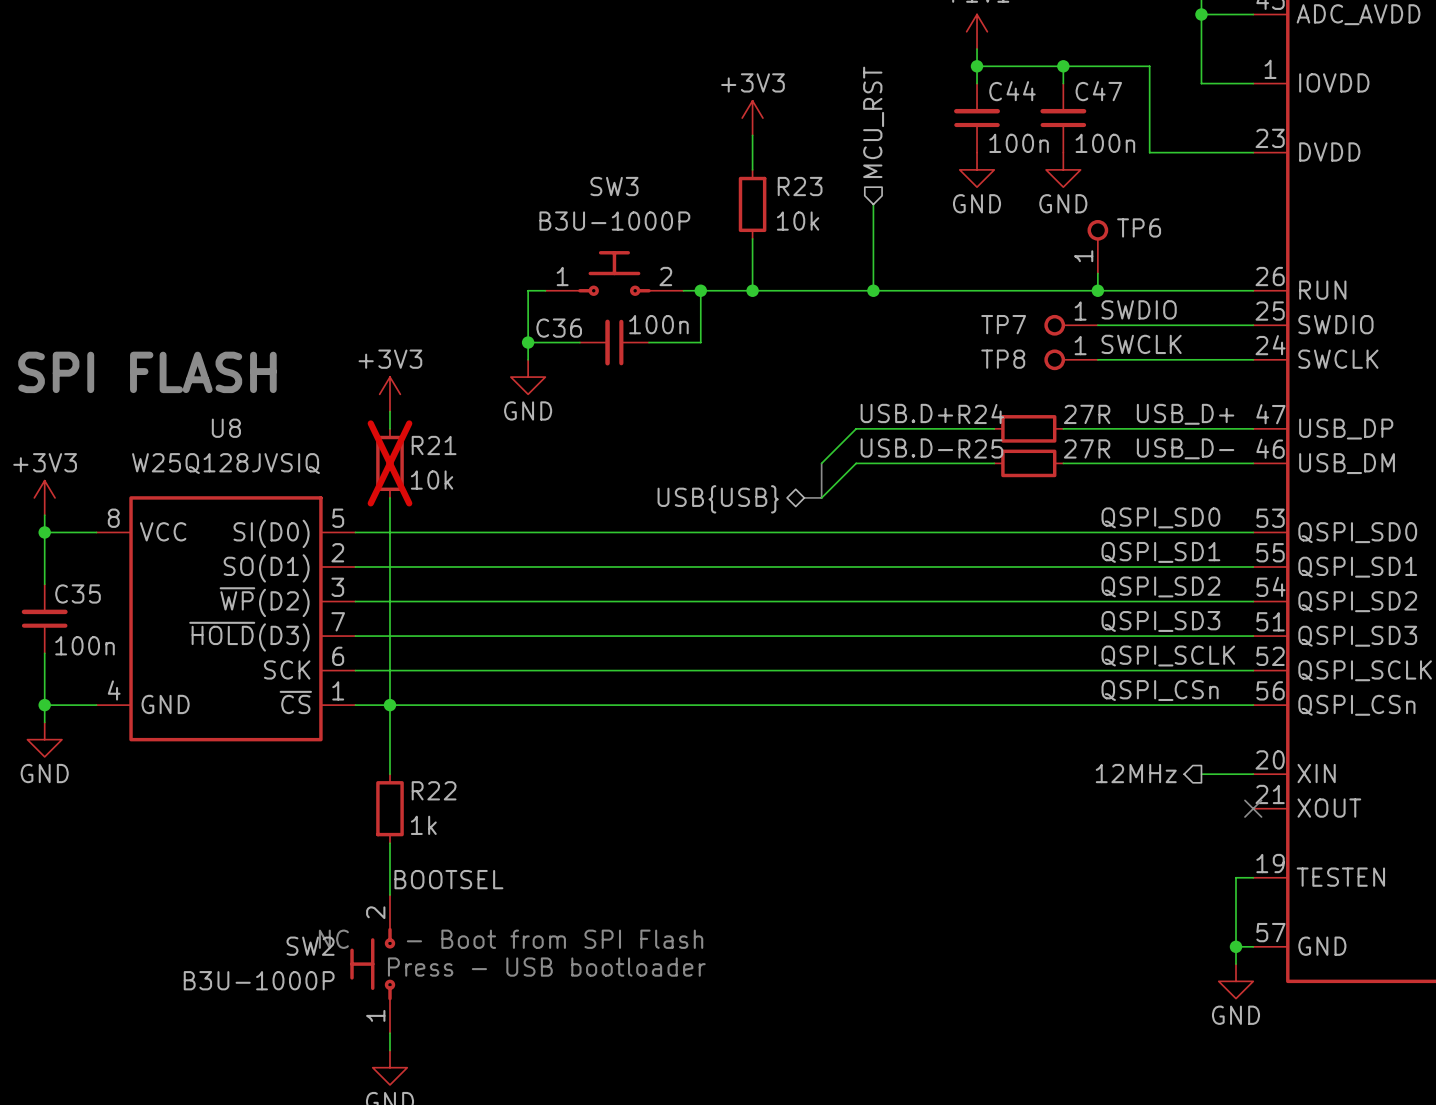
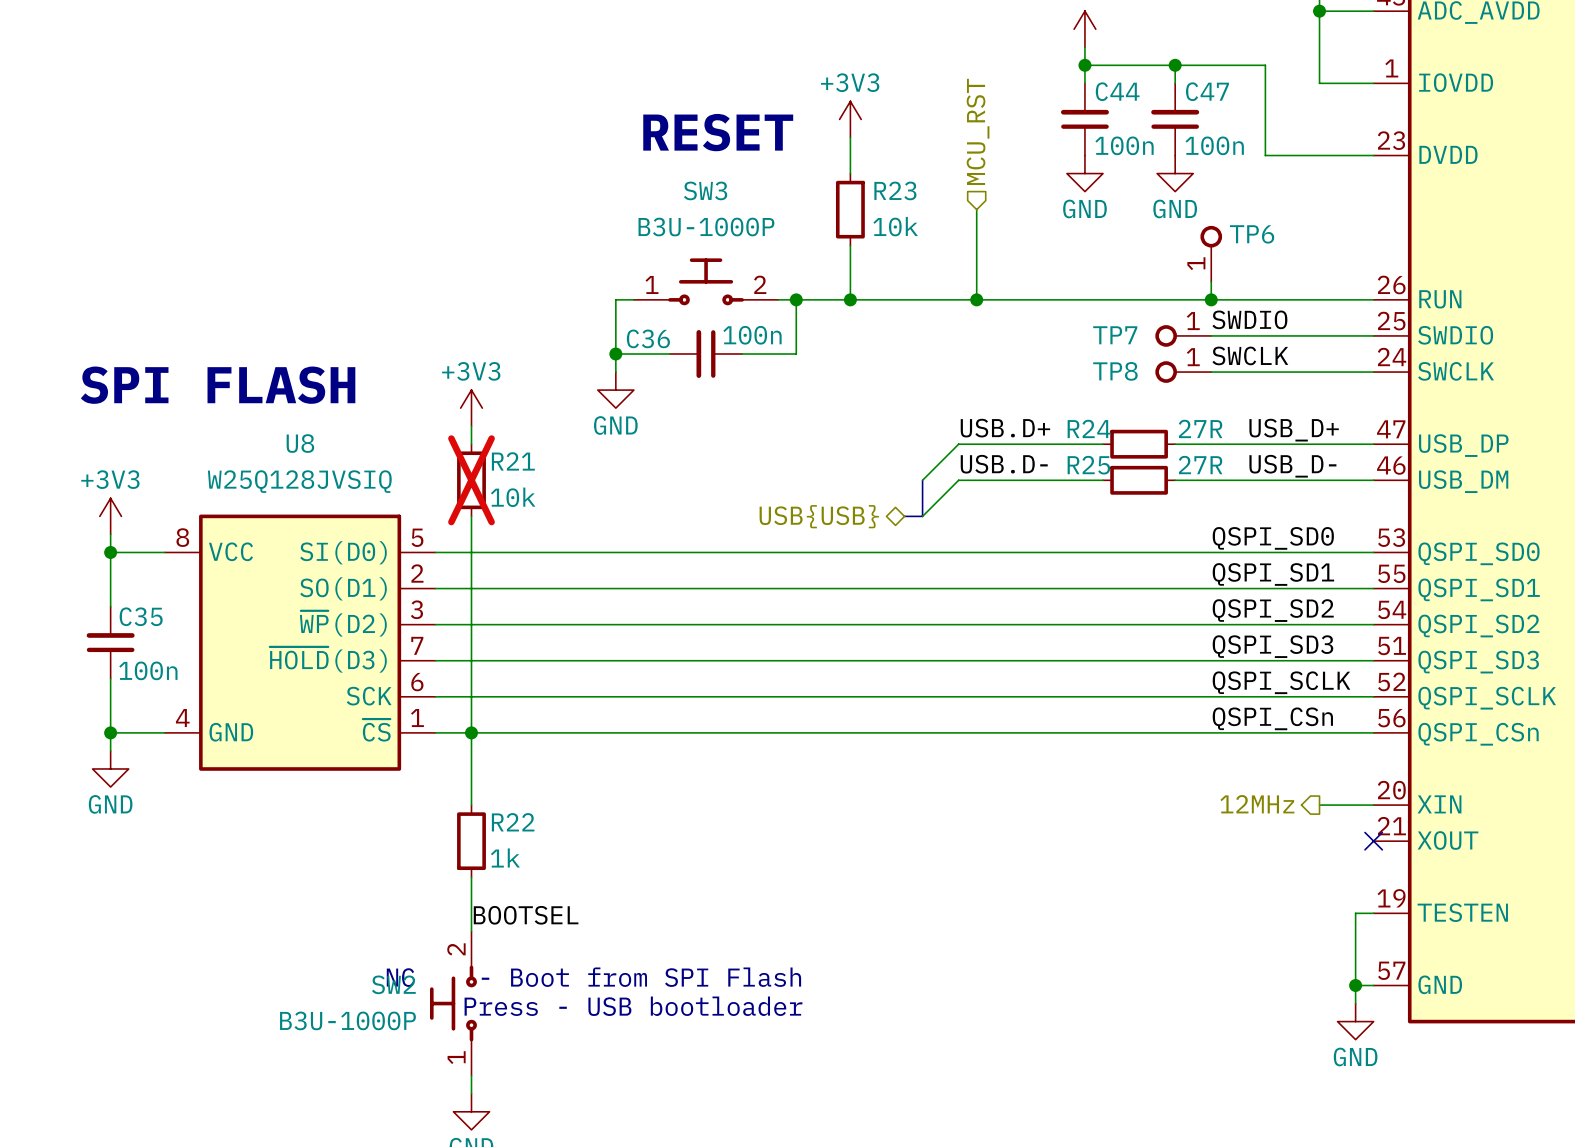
text: none -> RESET (718, 132)

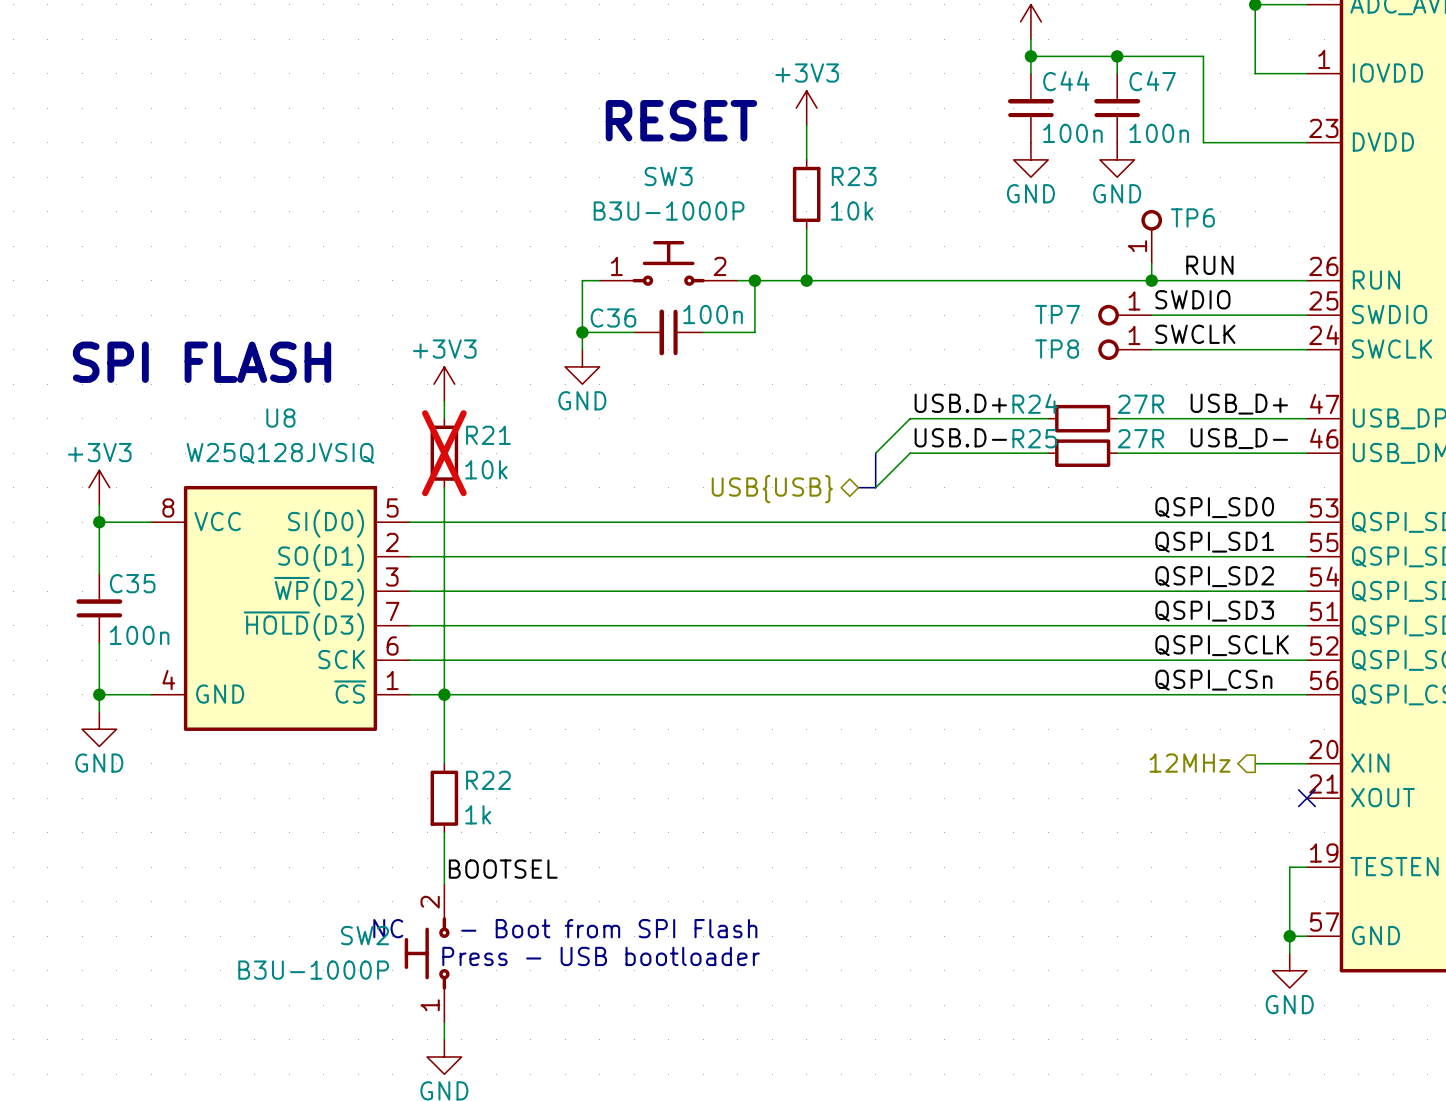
hierarchical label: MCU_RST (978, 131) -> none
wire: (976, 209) (976, 299) -> none
label: none -> RUN (1209, 265)
junction: (976, 299) -> none

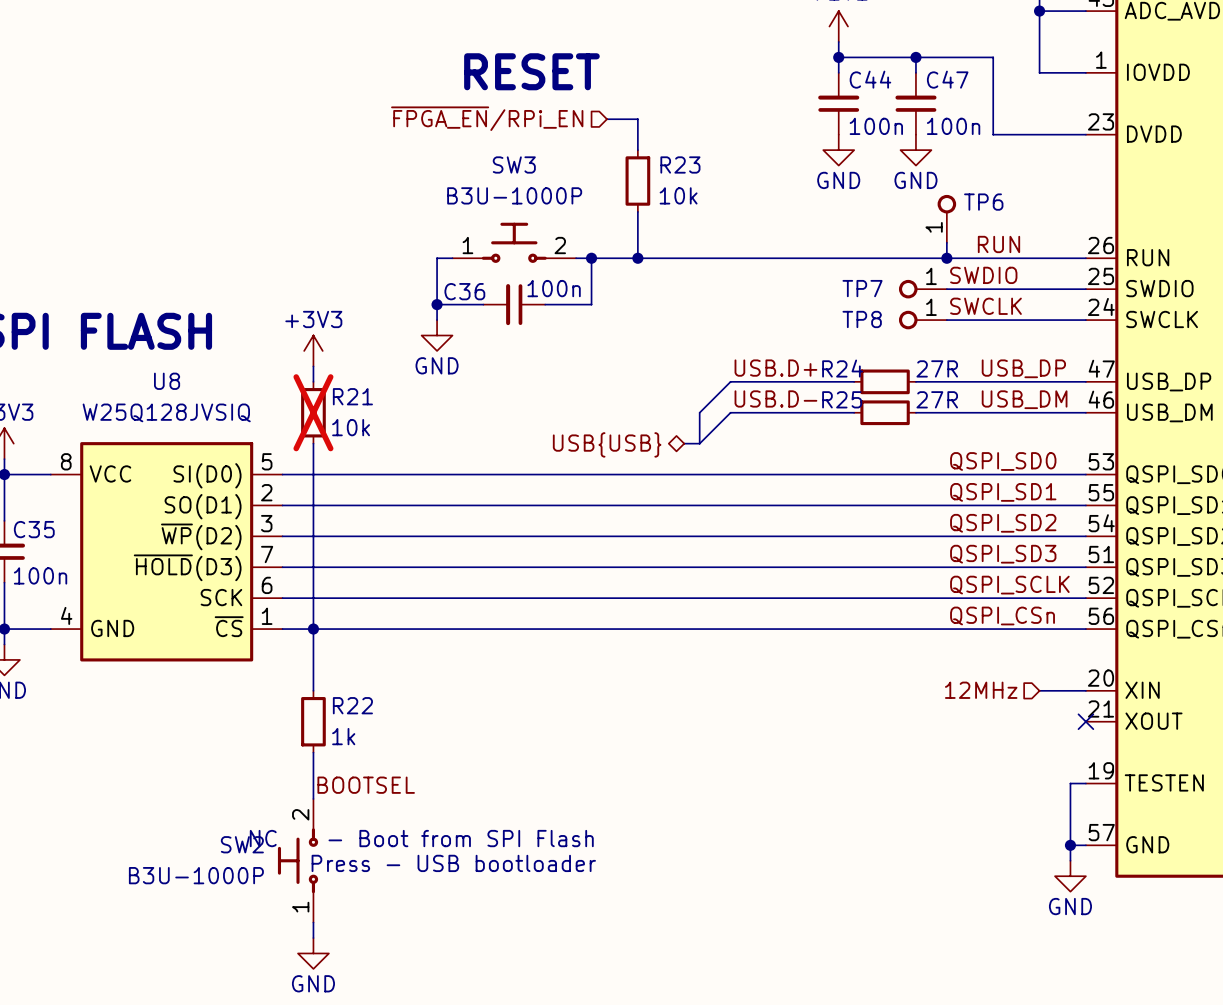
power symbol: +3V3 (806, 108) -> none
text position: RESET (681, 120) -> RESET (531, 71)
hierarchical label: none -> ~{FPGA_EN}/RPi_EN (487, 118)
wire: none -> (606, 119) (637, 119)
label: USB_D+ (1239, 404) -> USB_DP (1023, 368)
label: USB_D- (1239, 438) -> USB_DM (1024, 399)
hierarchical label shape: output (1190, 763) -> input (981, 690)

